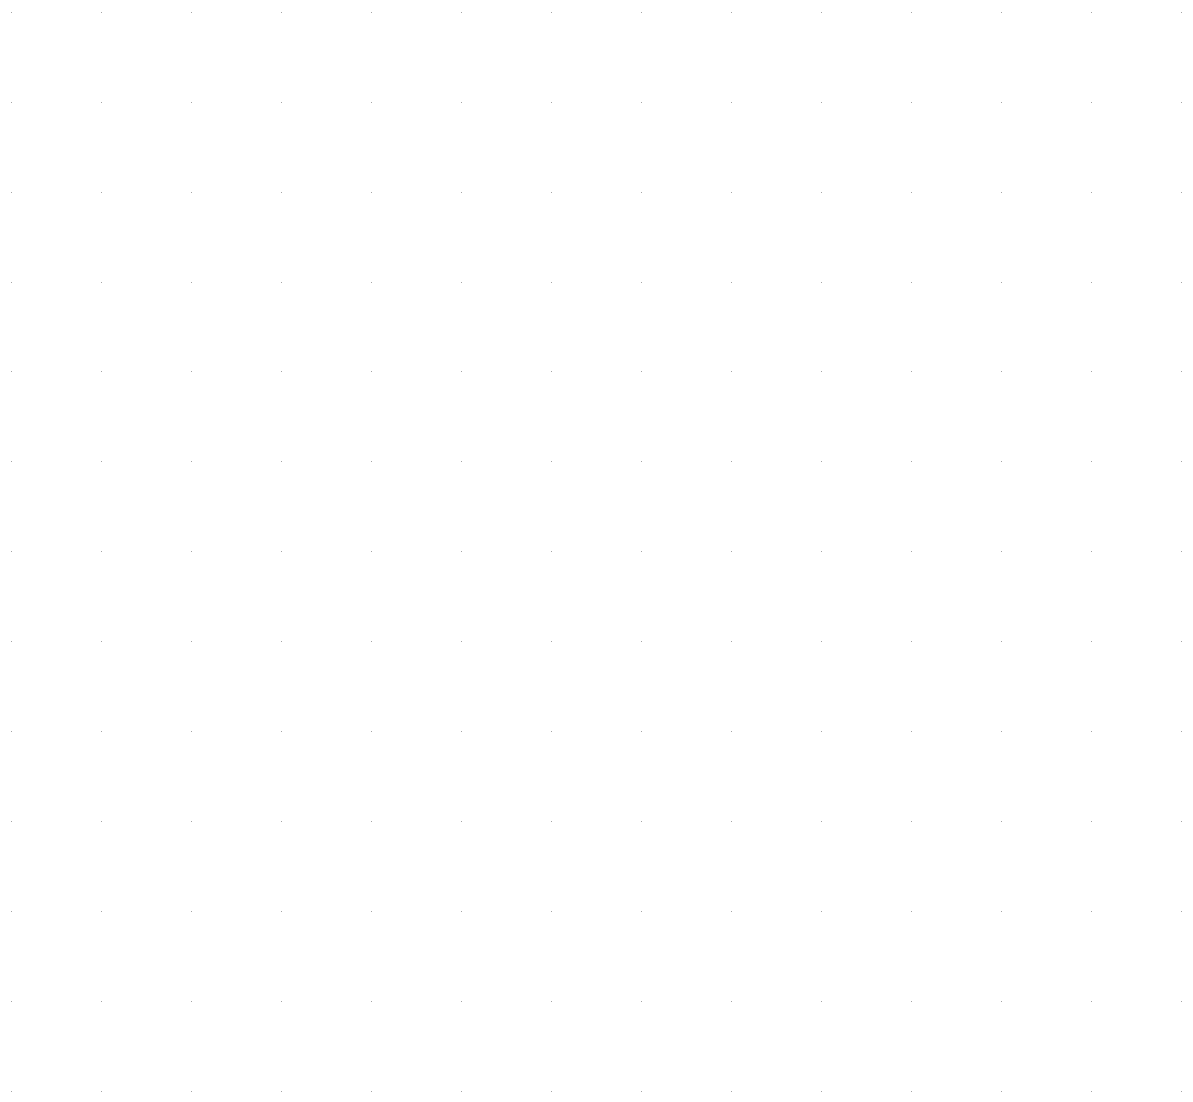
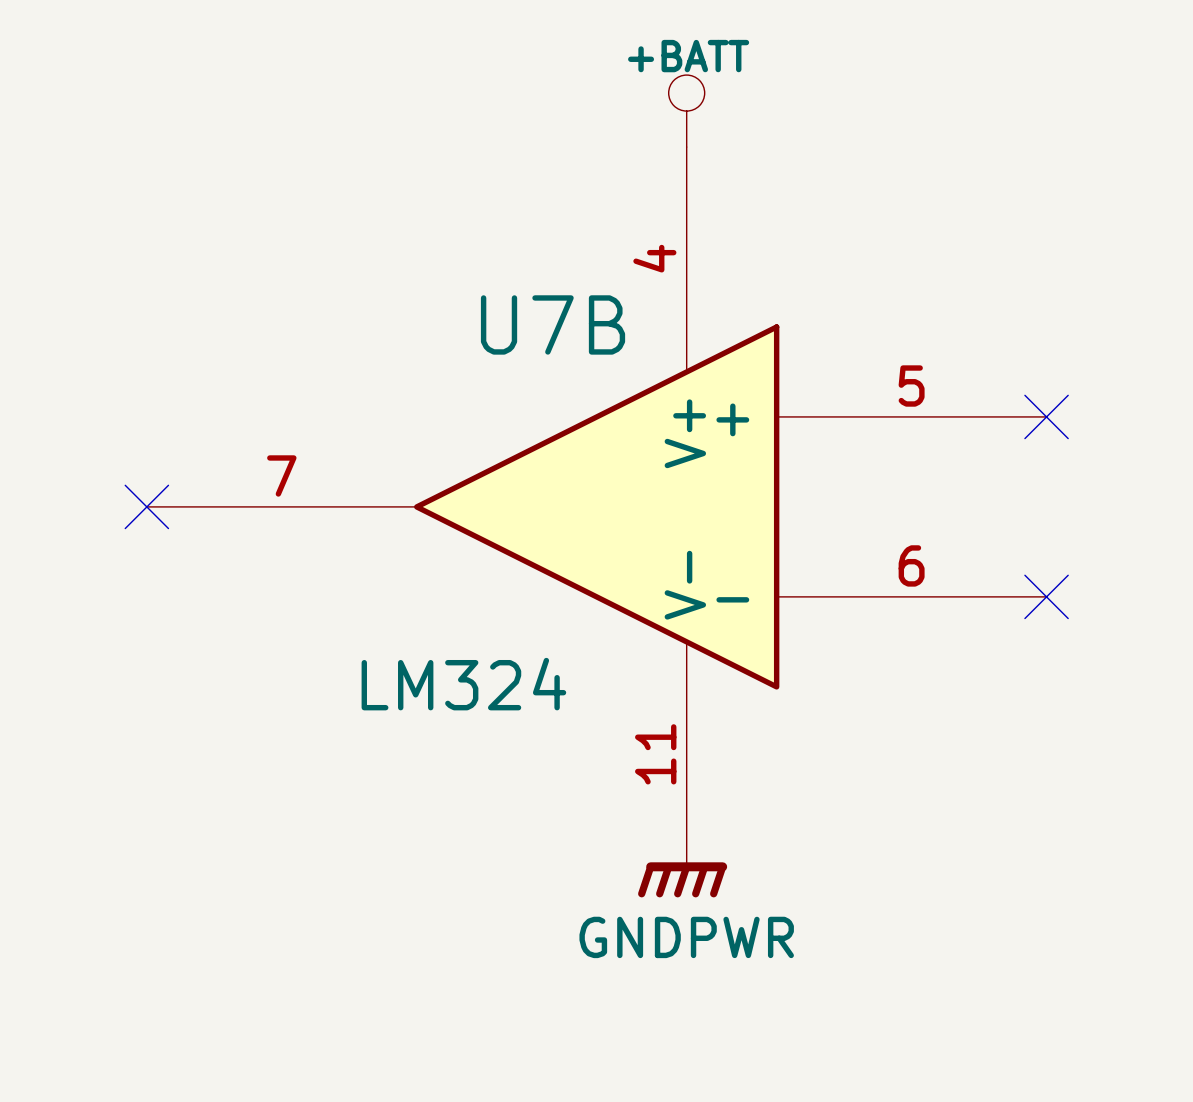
power symbol: none -> +BATT (686, 111)
no-connect mark: none -> (1046, 416)
no-connect mark: none -> (146, 506)
U7B: none -> LM324 (596, 506)
no-connect mark: none -> (1046, 596)
power symbol: none -> GNDPWR (682, 879)

